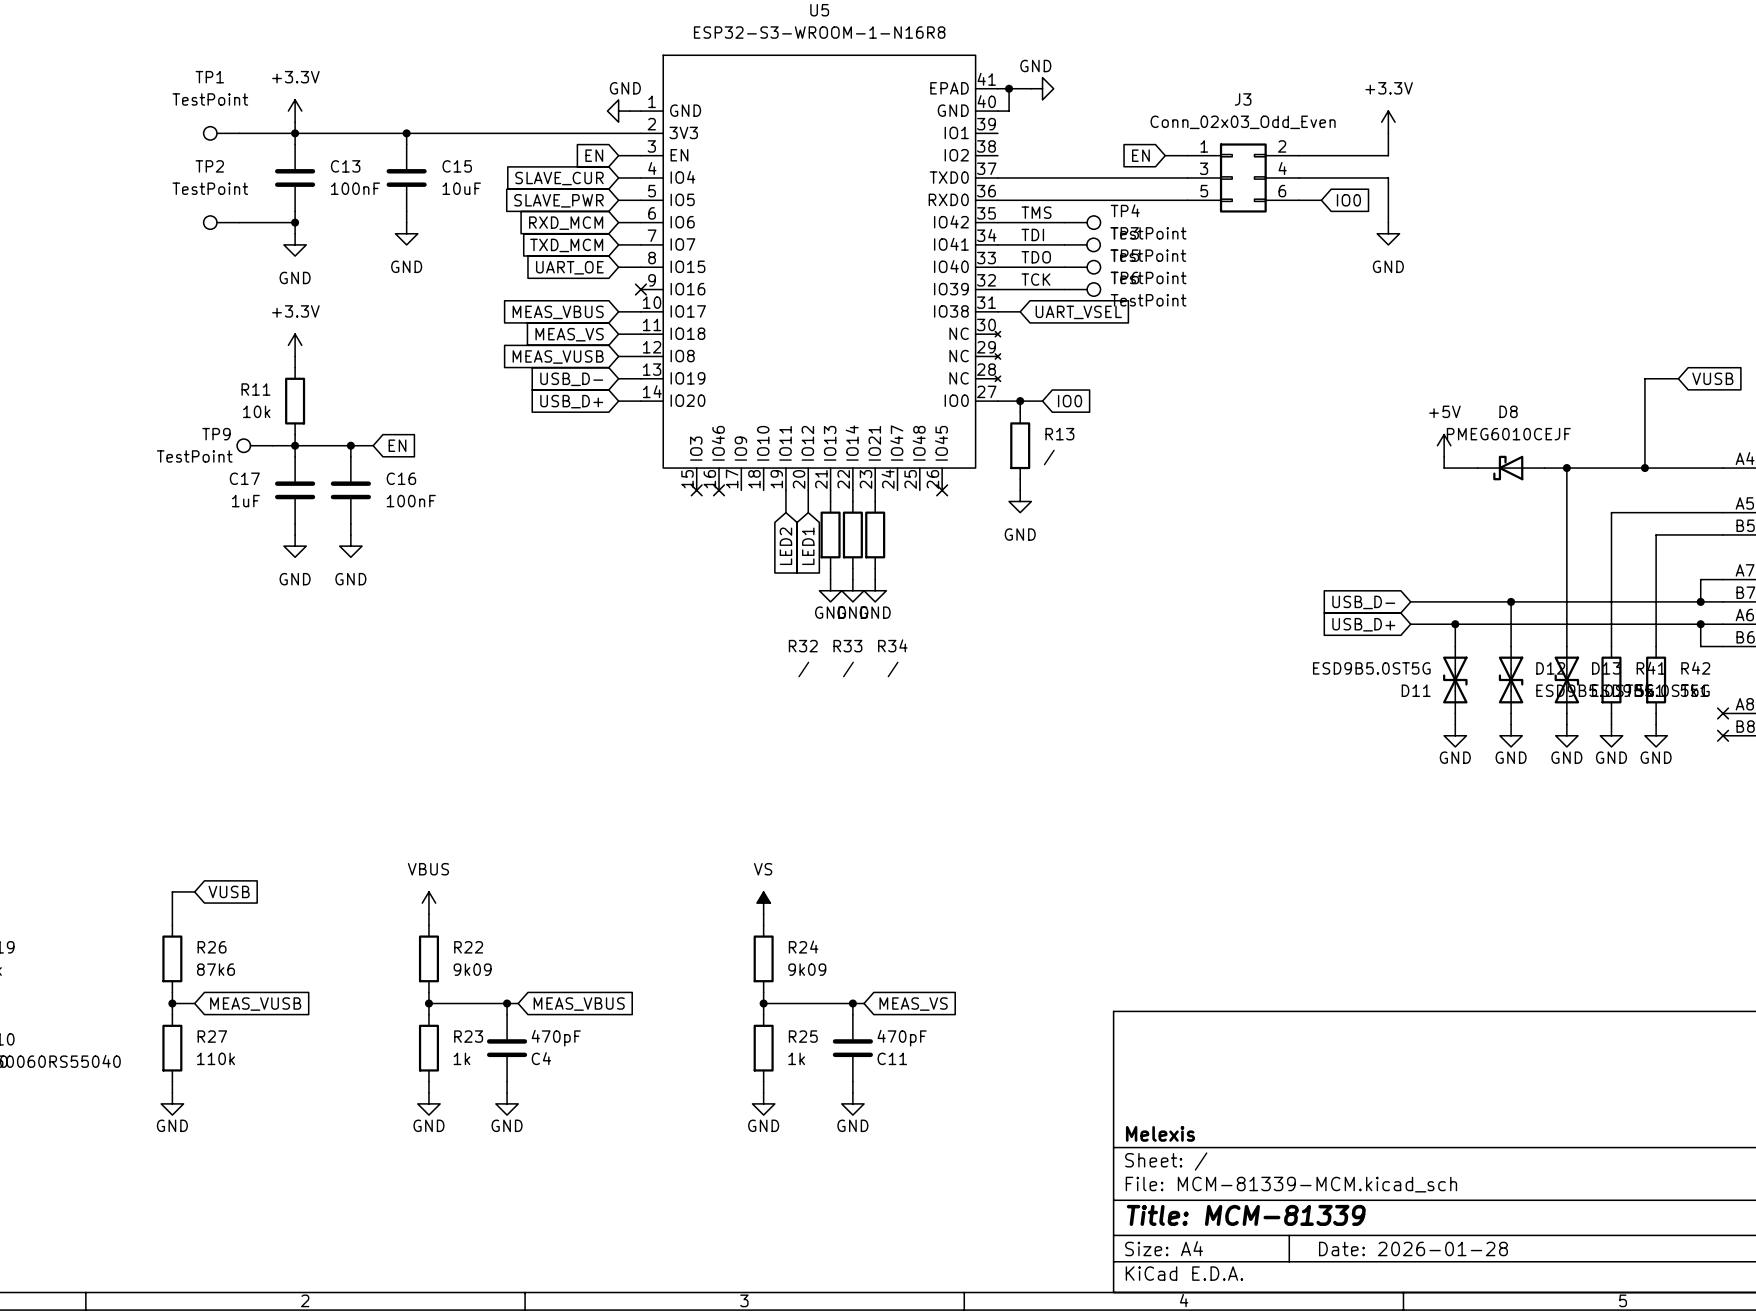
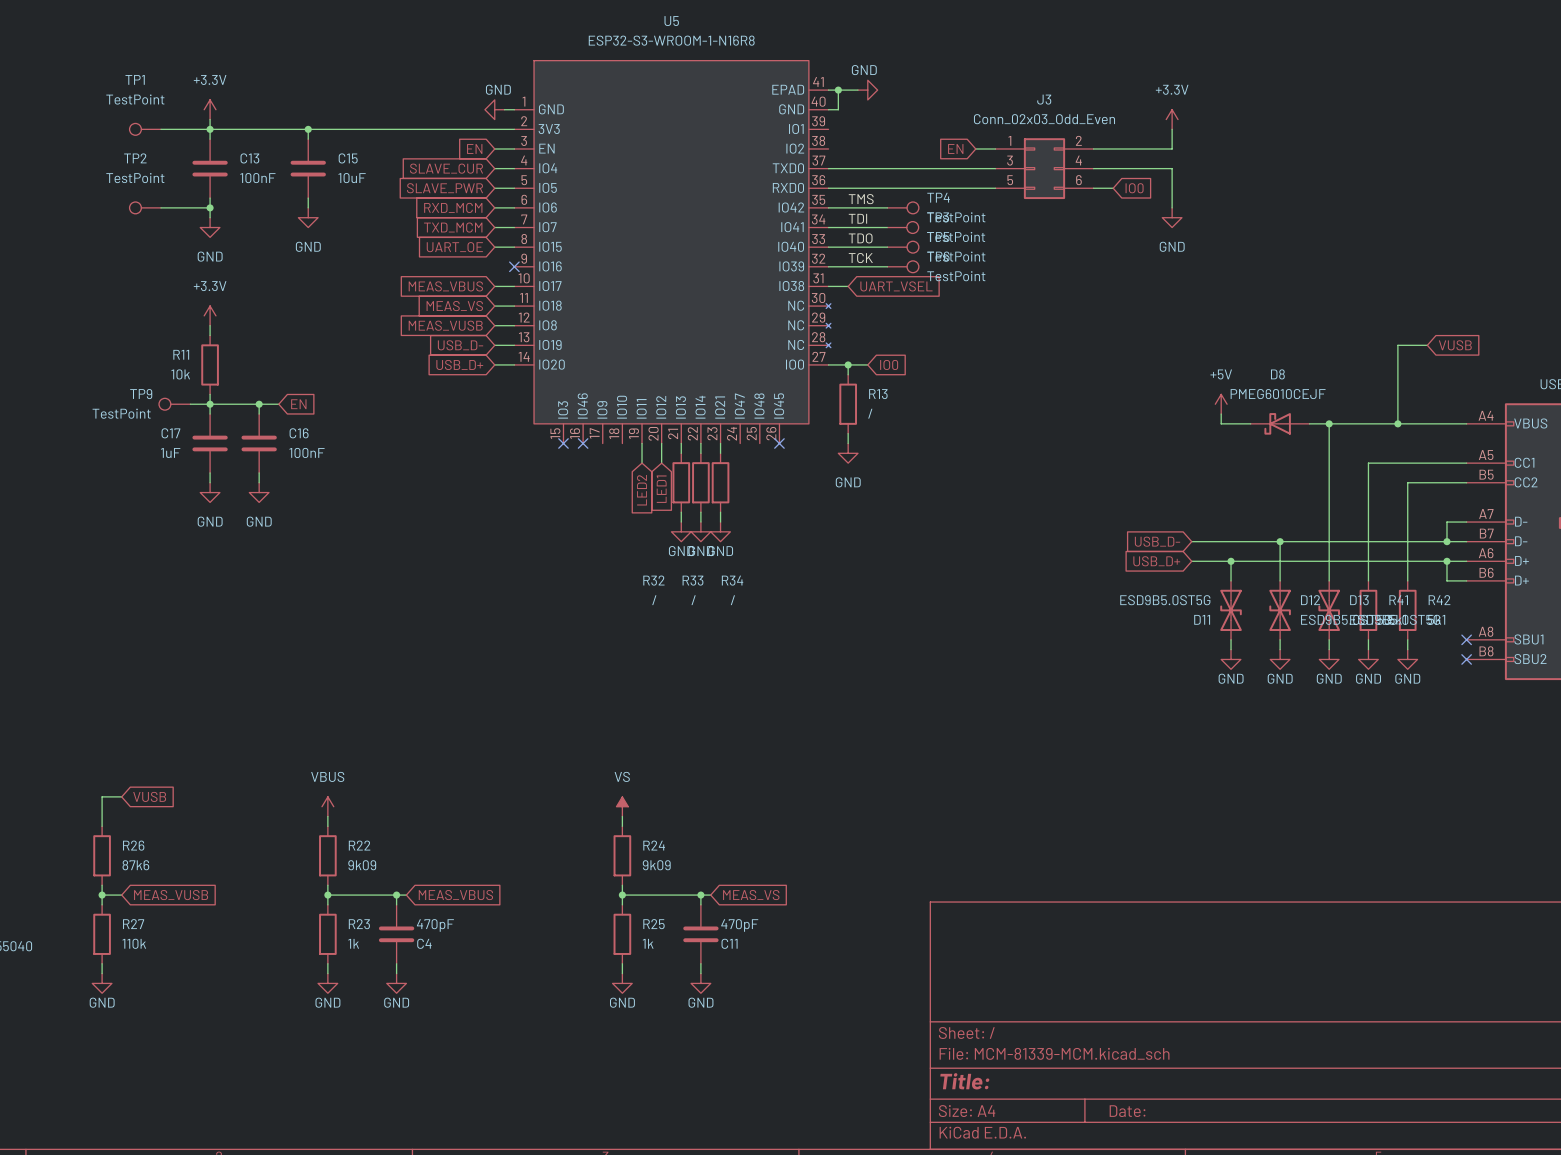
title block: Melexis (1160, 1133) -> none
title block: Title: MCM-81339 (1246, 1215) -> Title: (964, 1081)
title block: Date: 2026-01-28 (1413, 1248) -> Date: (1127, 1111)

